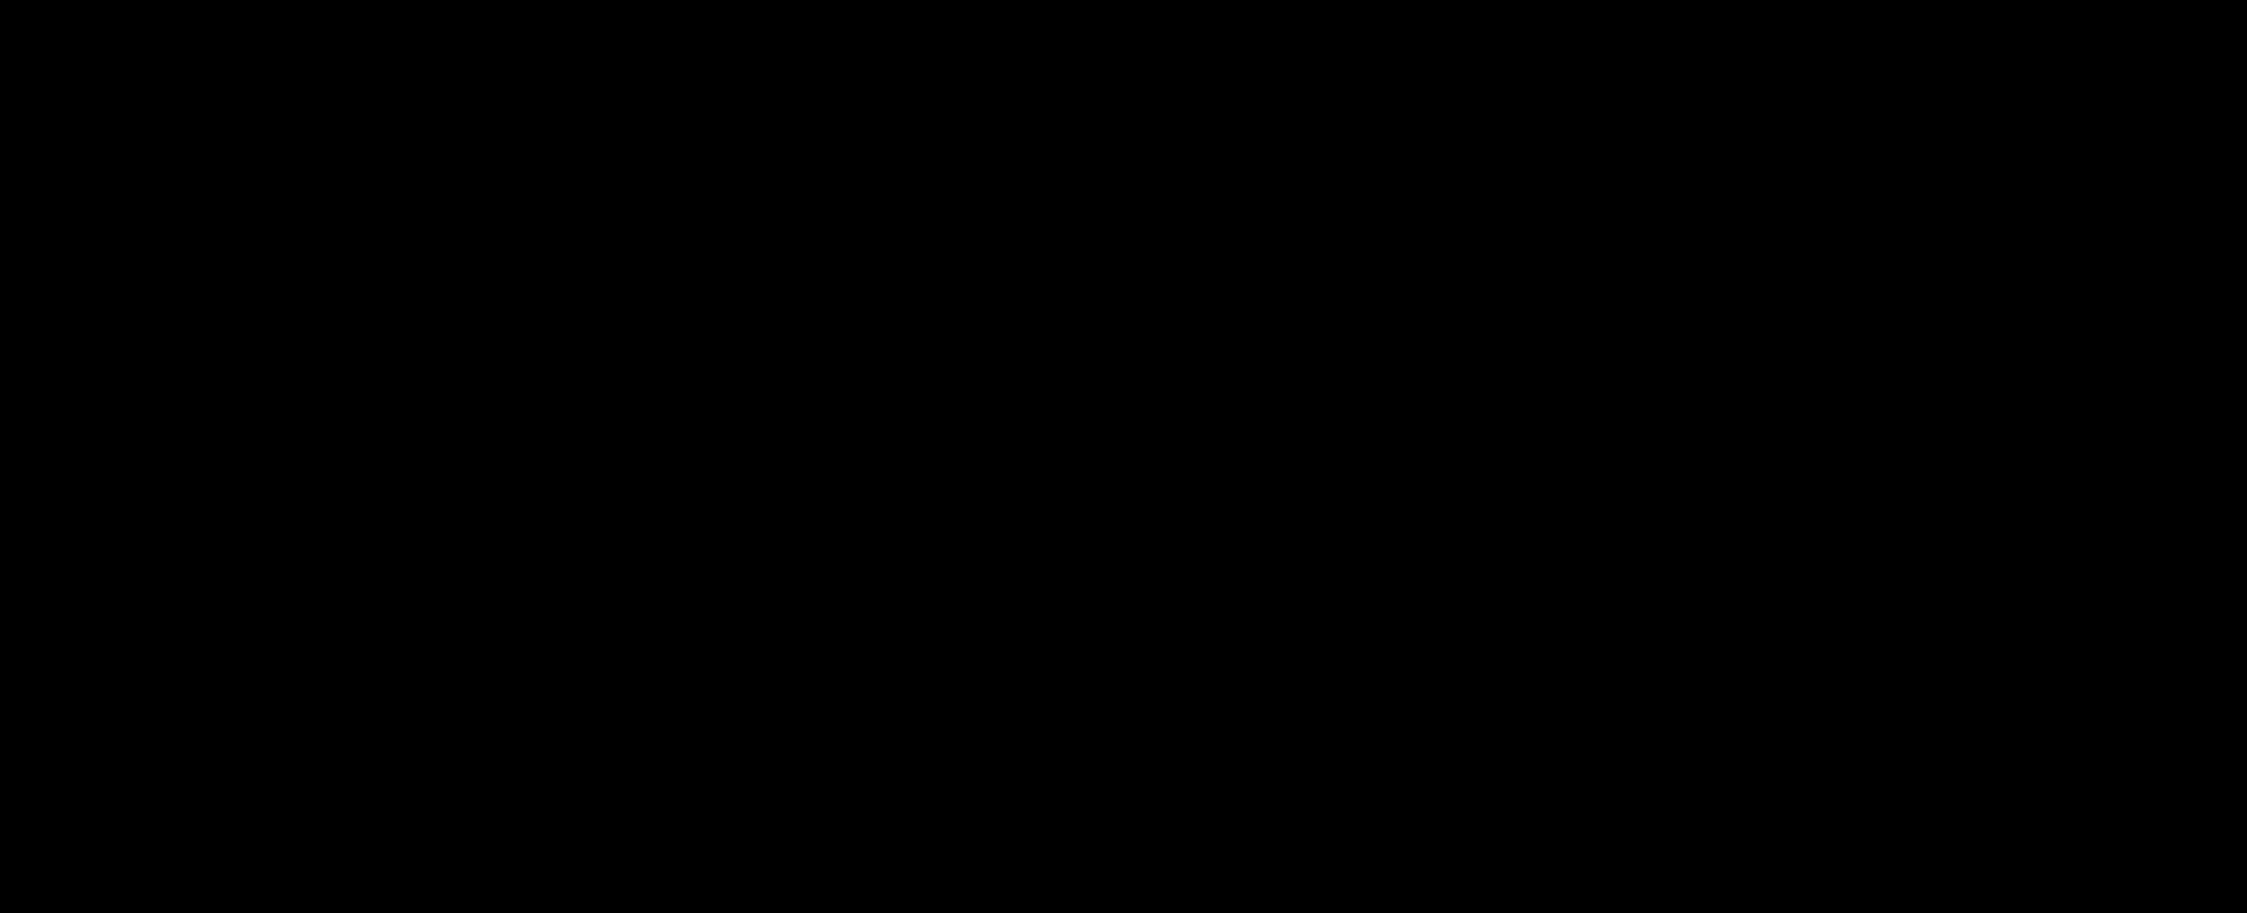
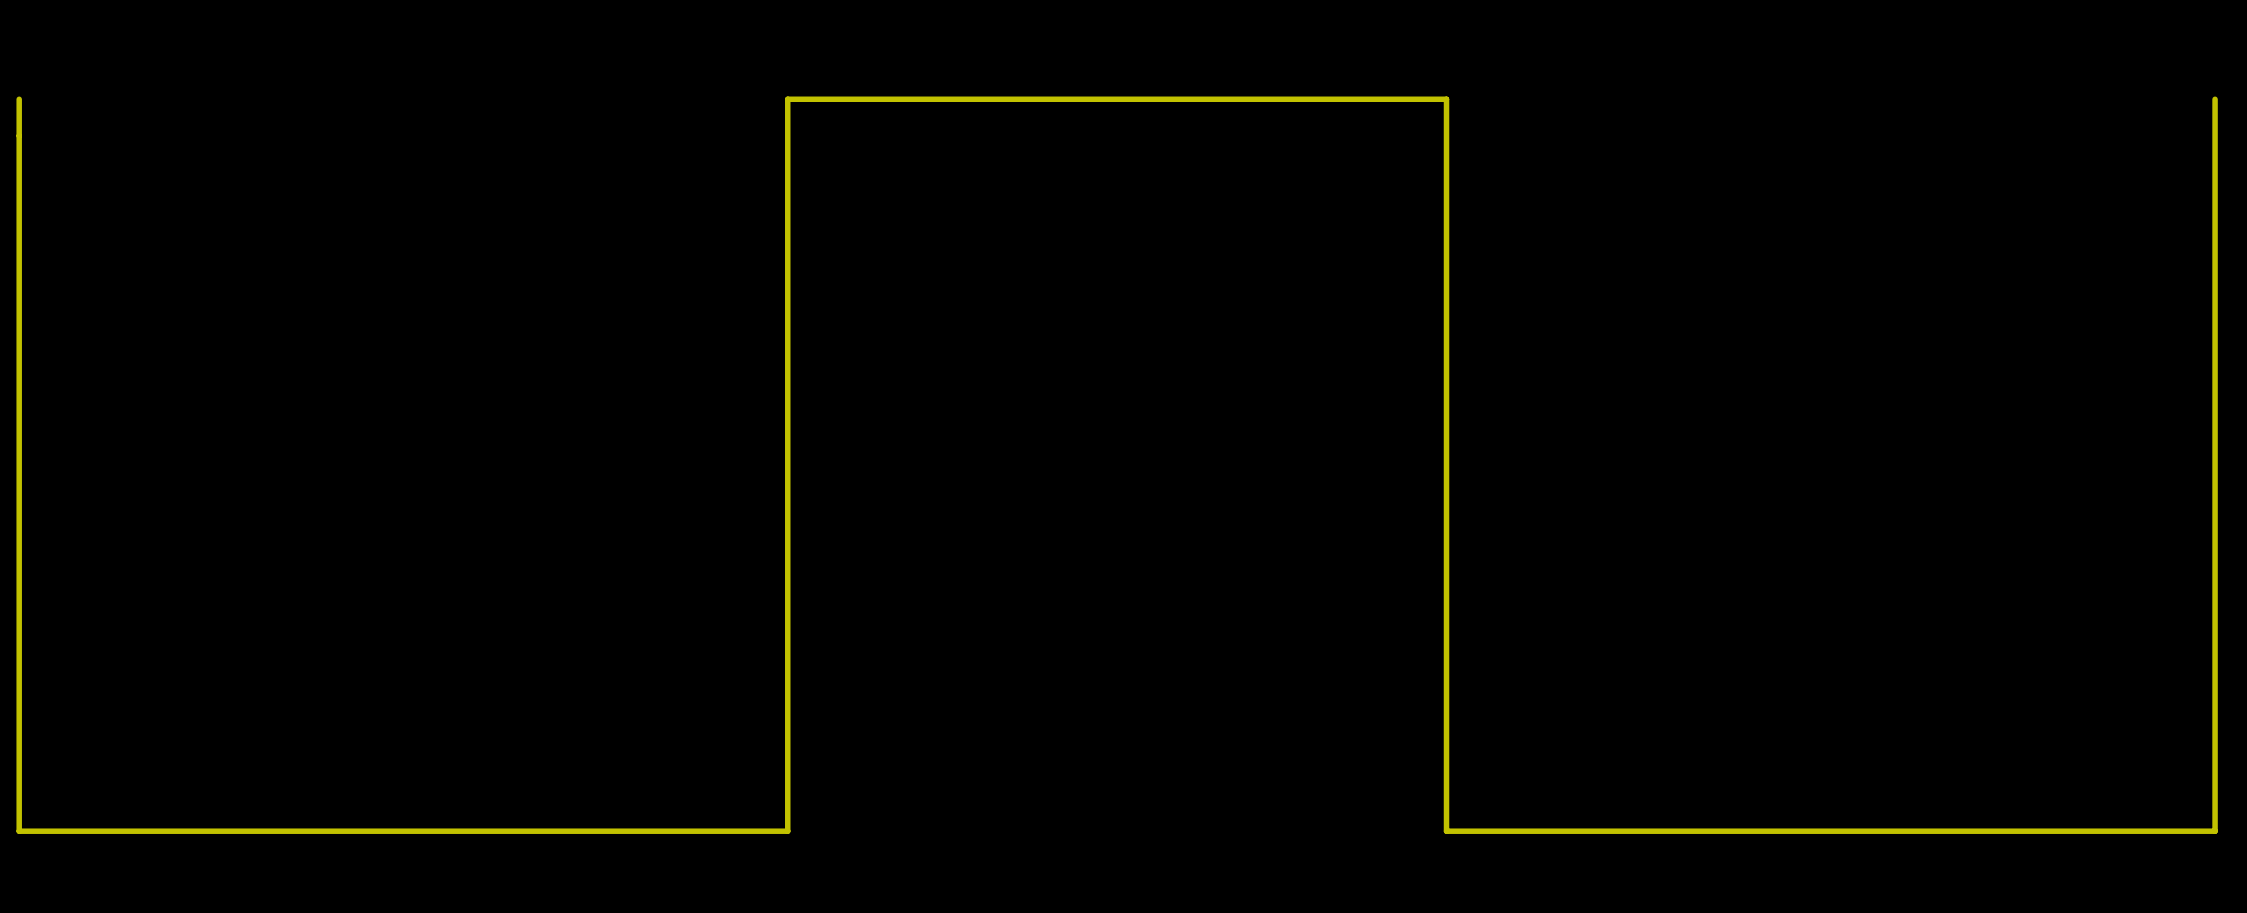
board edge: none -> (2215, 99) (2215, 831) (1446, 831) (1446, 99) (787, 99) (787, 831) (19, 831) (19, 99)

